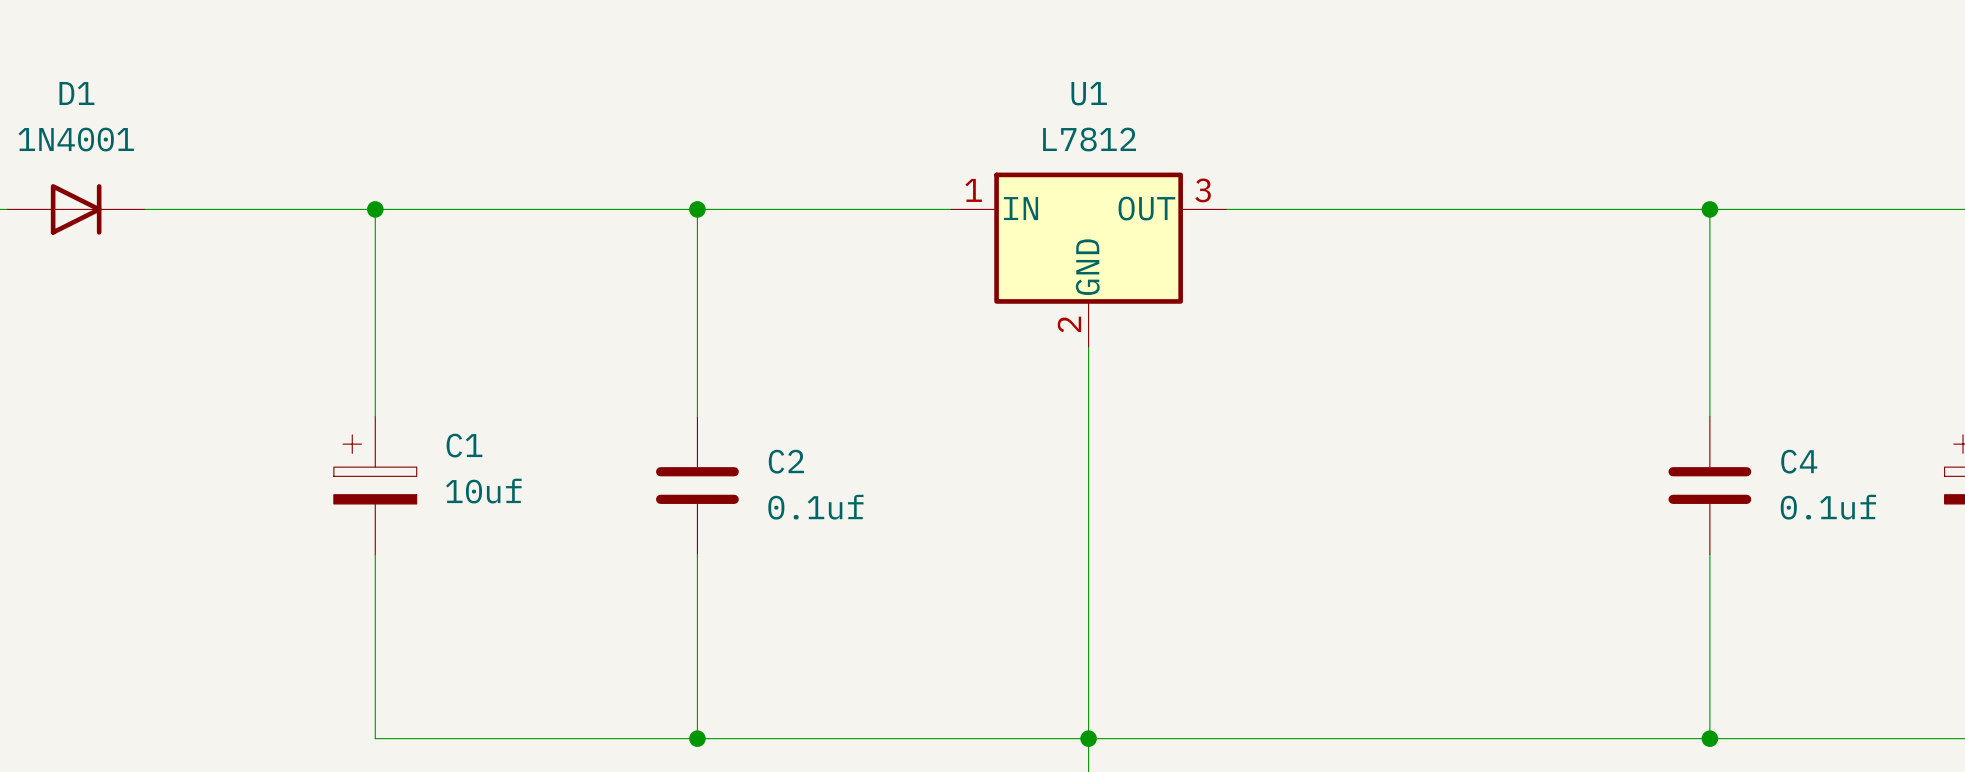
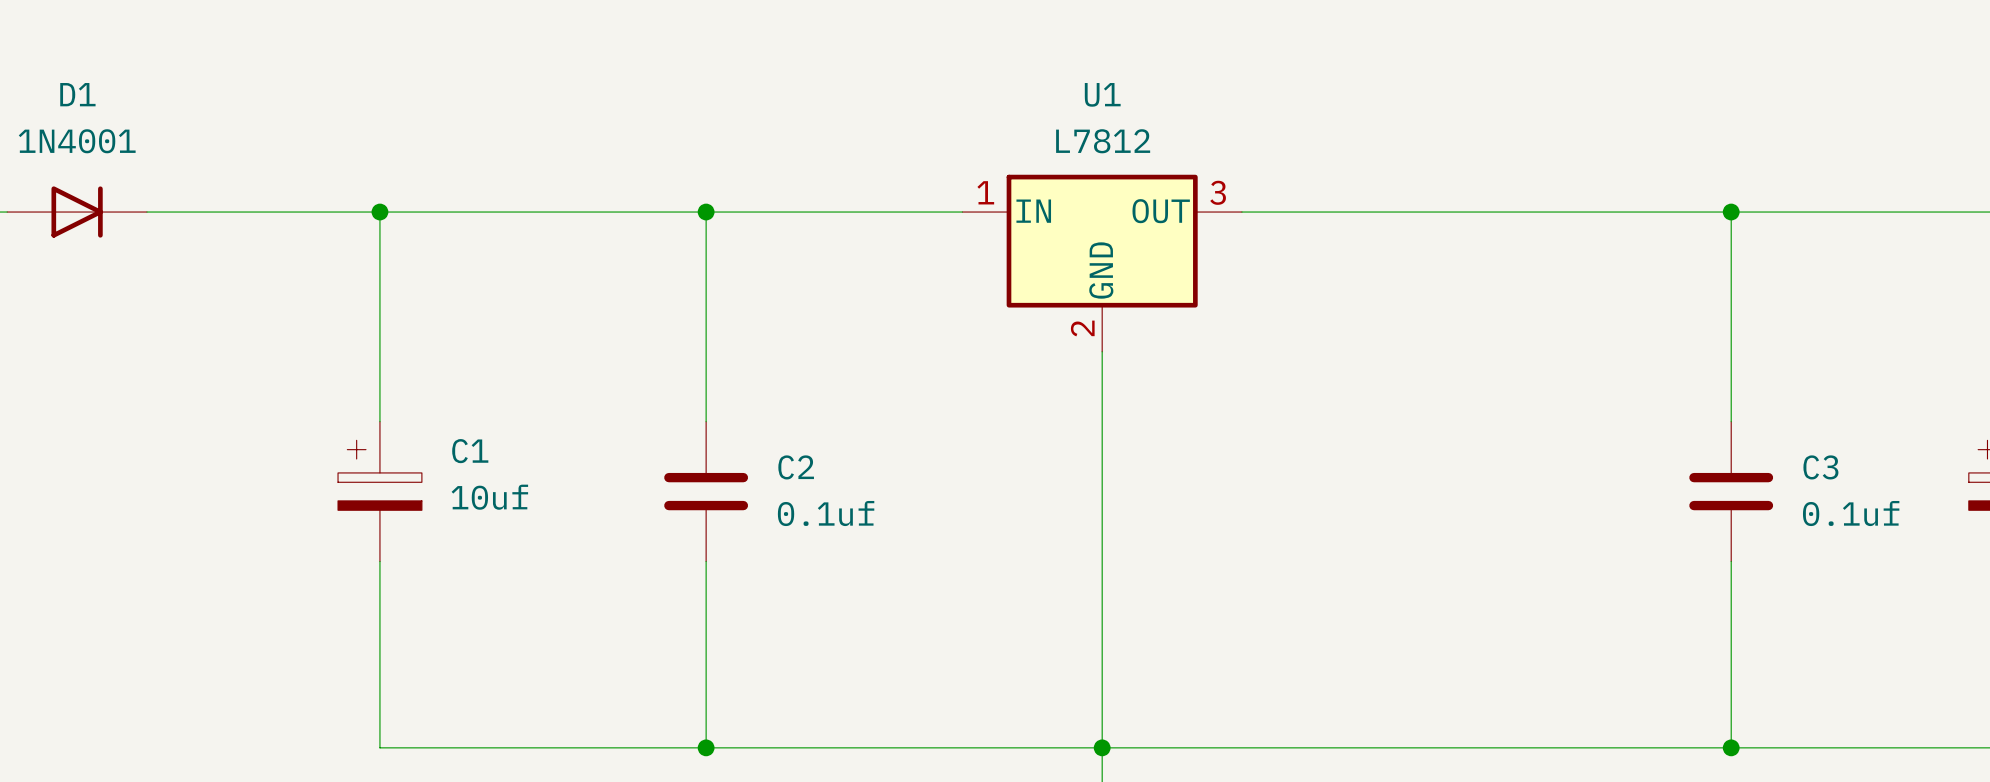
C4 name: C4 (1799, 461) -> C3 (1820, 467)

